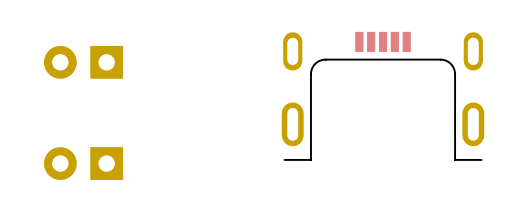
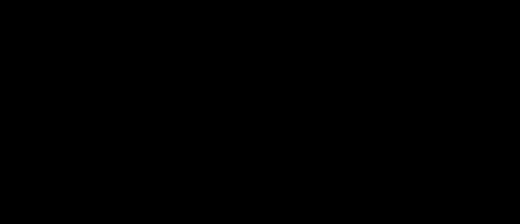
part: (83, 62) -> none
part: (383, 95) -> none
part: (83, 163) -> none

